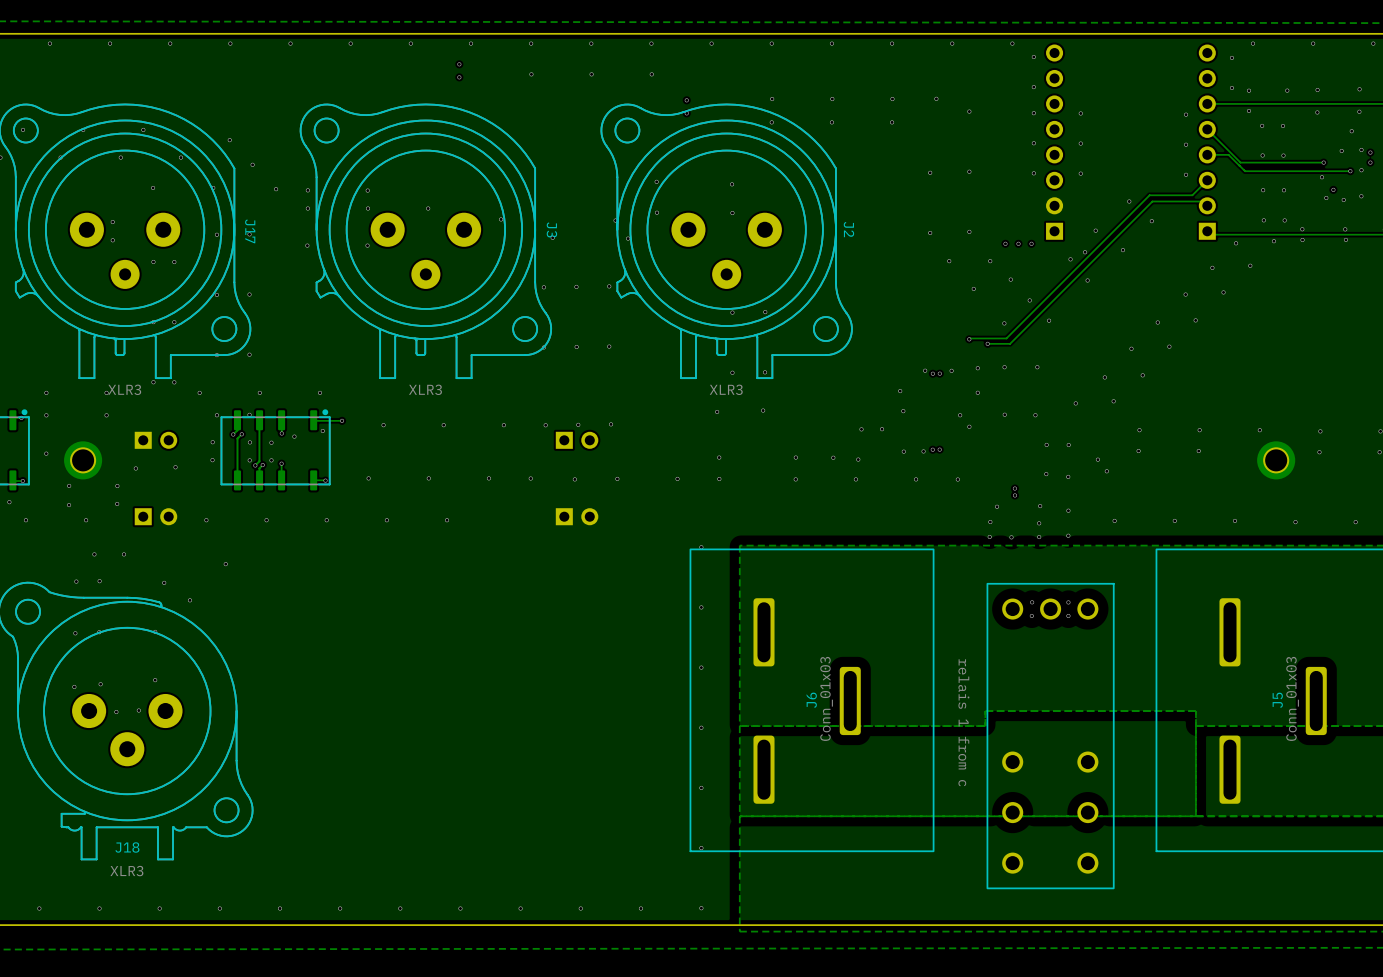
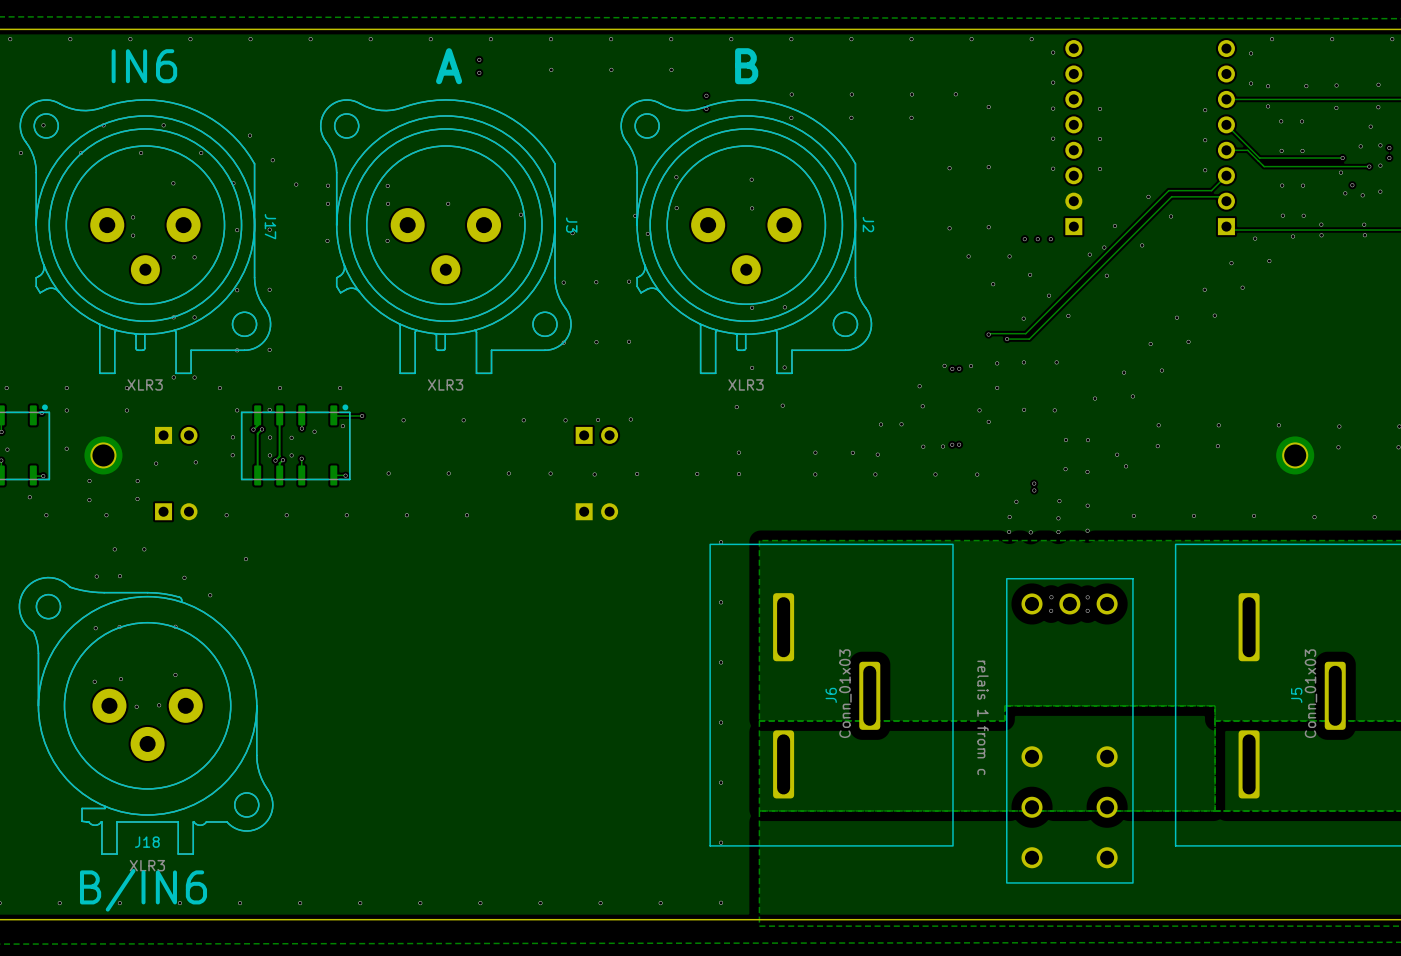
text: none -> IN6 (144, 66)
text: none -> A (449, 66)
text: none -> B (746, 66)
text: none -> B/IN6 (143, 890)

